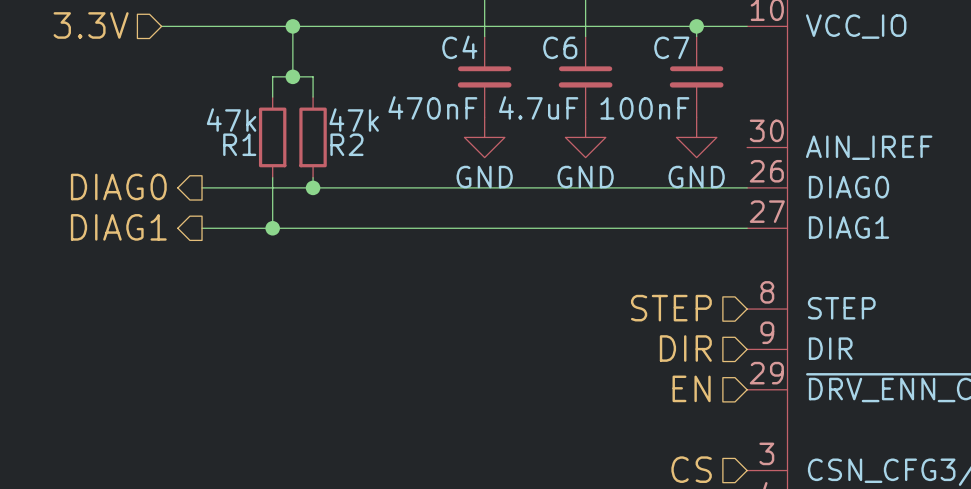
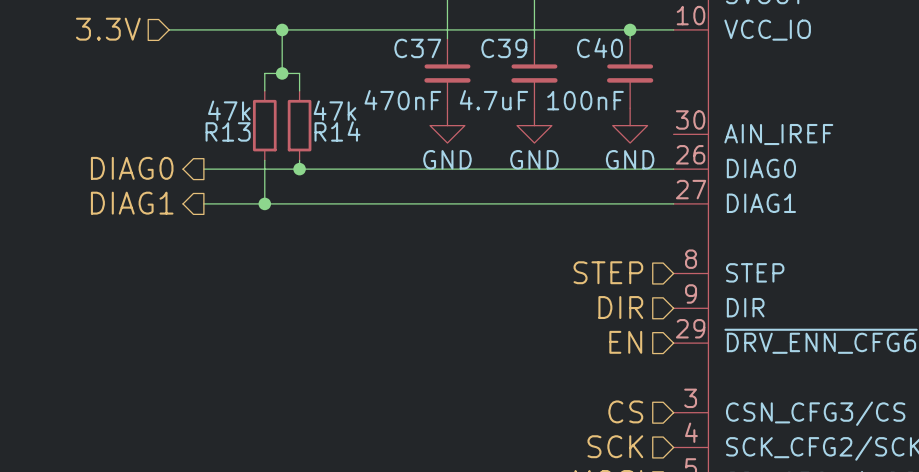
C4 name: C4 (459, 47) -> C37 (417, 48)
C6 name: C6 (560, 47) -> C39 (504, 48)
C7 name: C7 (671, 47) -> C40 (600, 48)
R1 name: R1 (239, 144) -> R13 (228, 131)
R2 name: R2 (346, 144) -> R14 (337, 131)

